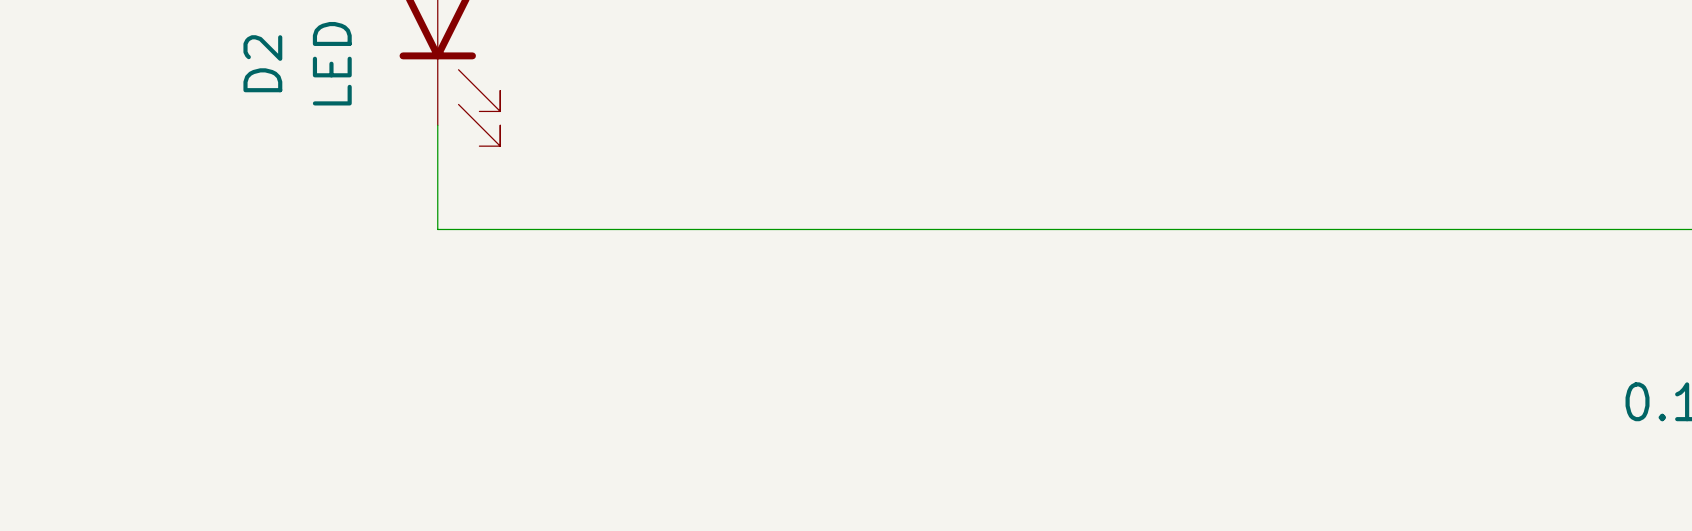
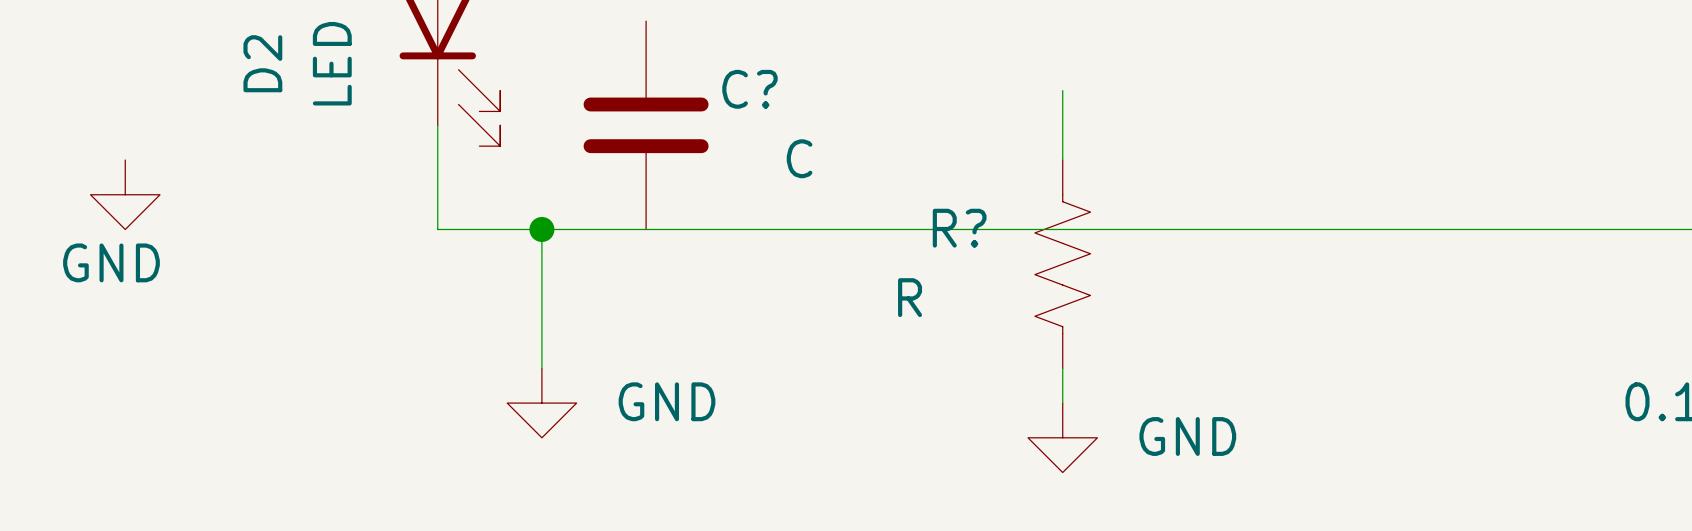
wire: none -> (1062, 90) (1062, 160)
C?: none -> C (646, 125)
power symbol: none -> GND (125, 194)
wire: none -> (541, 229) (541, 368)
junction: none -> (541, 229)
R?: none -> R (1062, 264)
wire: none -> (1062, 368) (1062, 403)
power symbol: none -> GND (541, 403)
power symbol: none -> GND (1062, 437)

